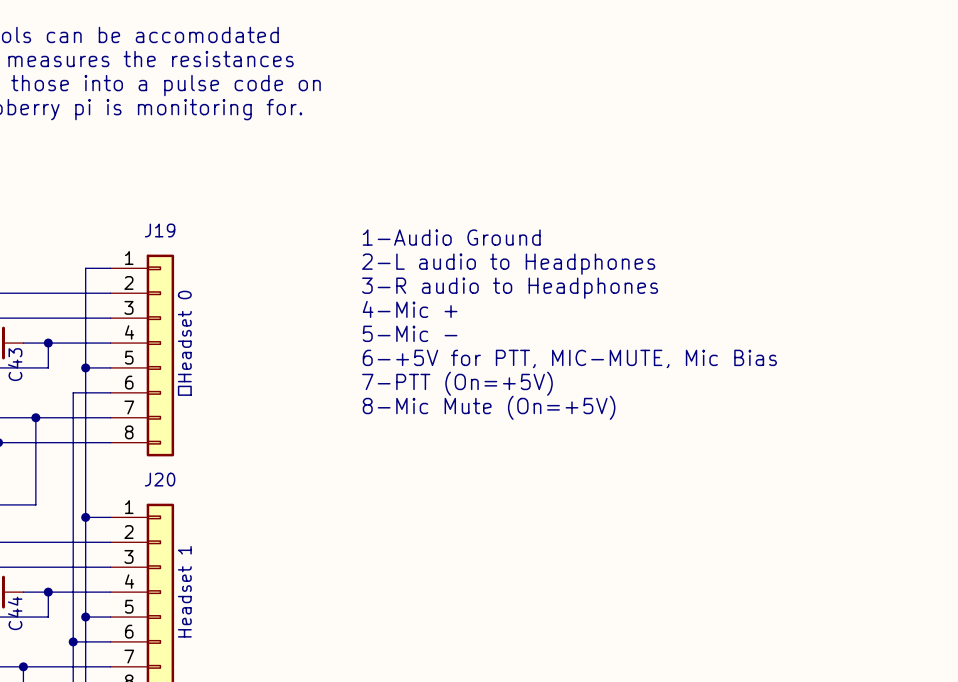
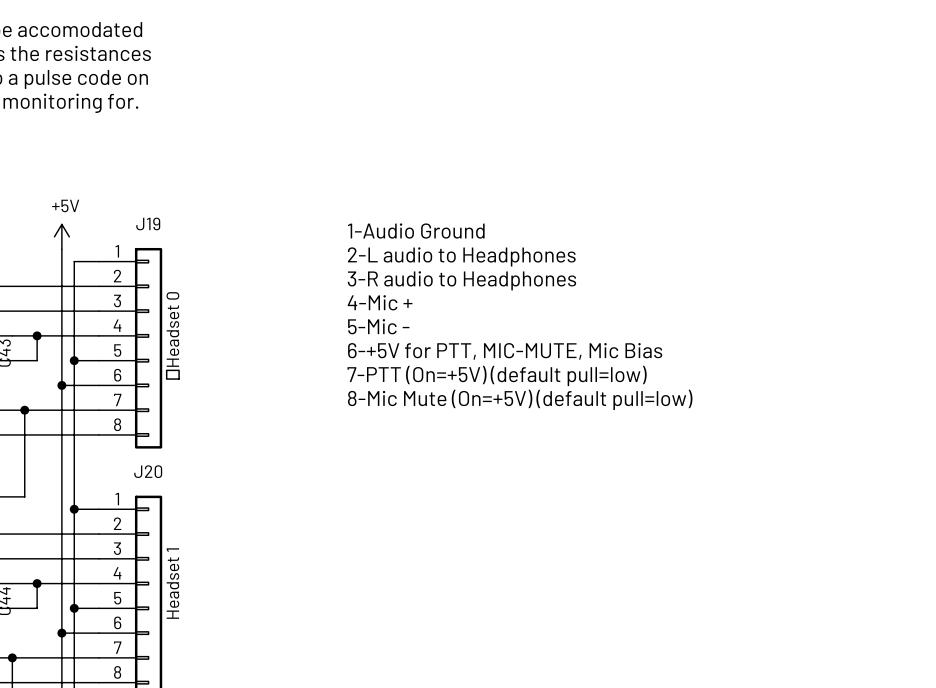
power symbol: none -> +5V (61, 236)
wire: none -> (61, 249) (61, 385)
text: 7-PTT (On=+5V) (457, 383) -> 7-PTT (On=+5V) (default pull=low) (497, 375)
junction: none -> (61, 385)
text: 8-Mic Mute (On=+5V) (489, 407) -> 8-Mic Mute (On=+5V) (default pull=low) (520, 399)

